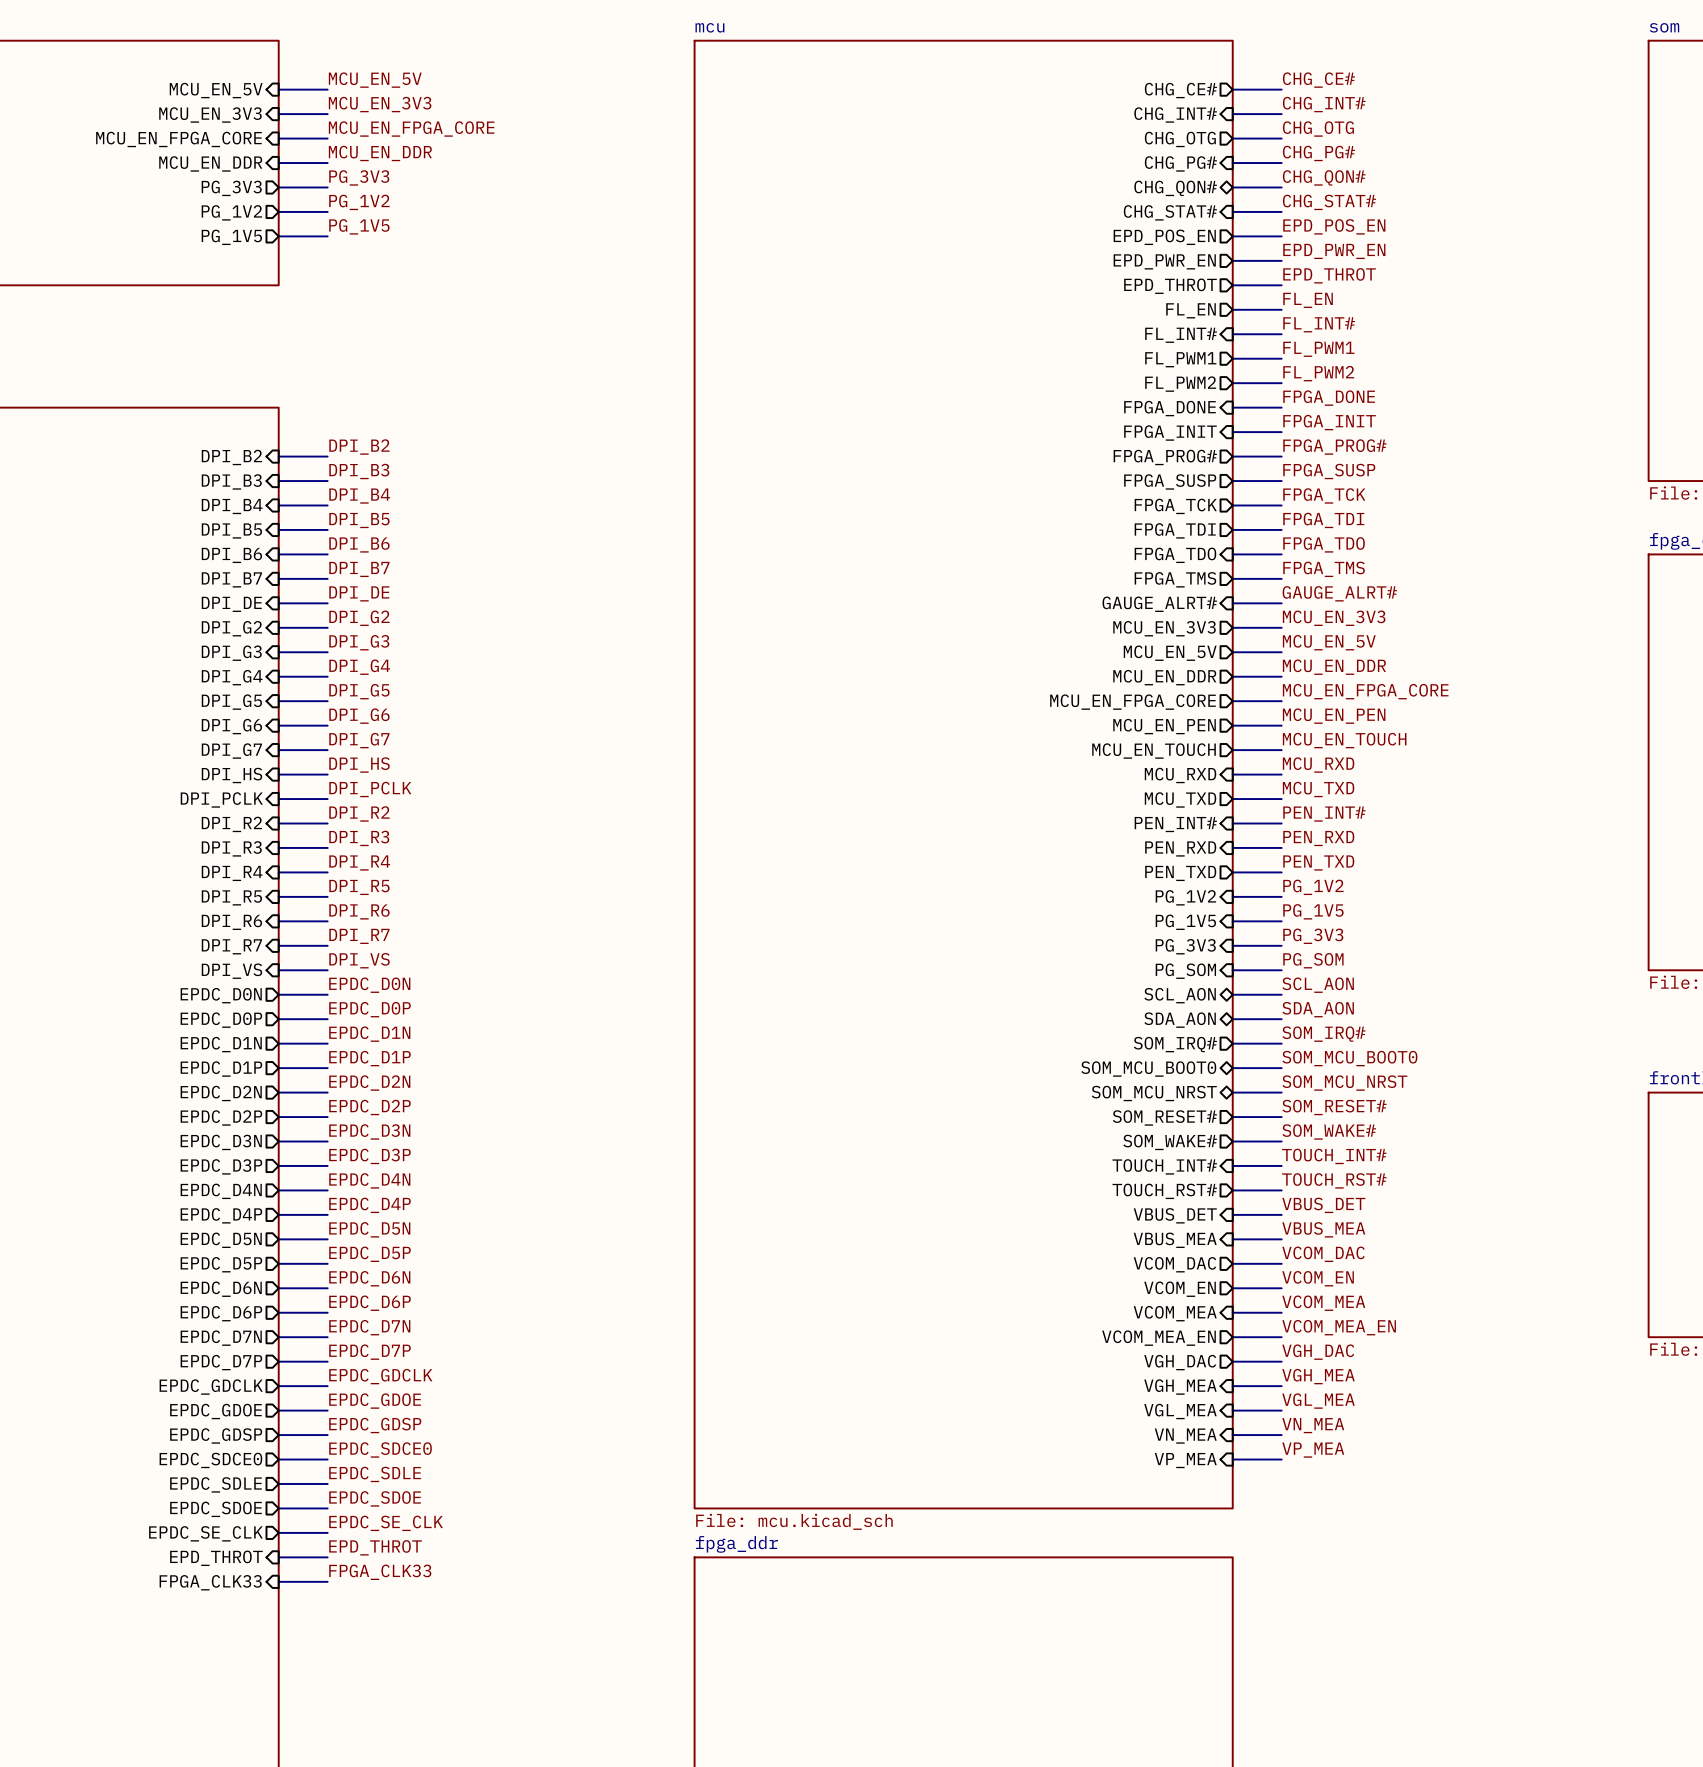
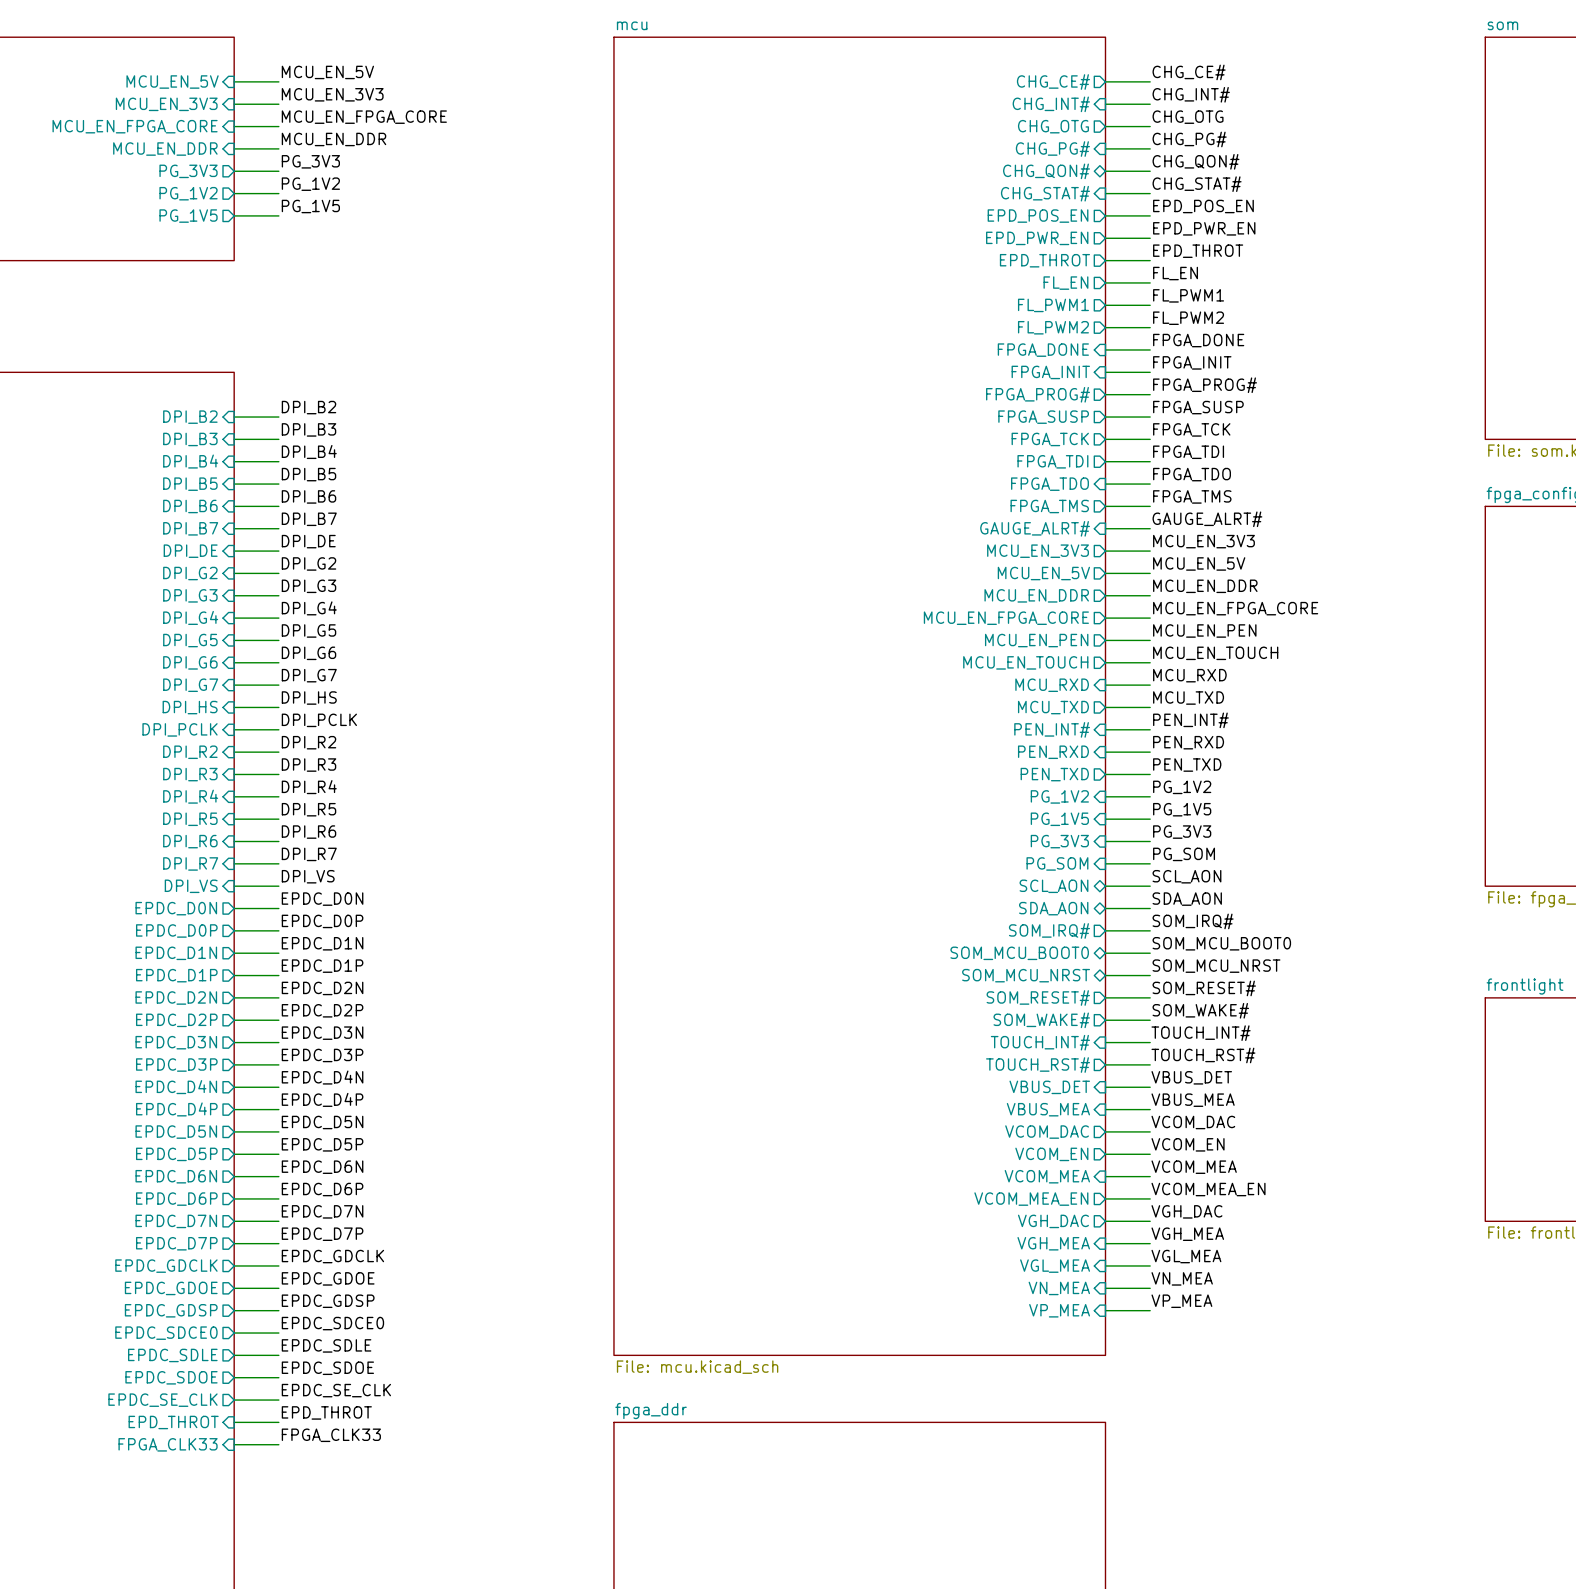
label: FL_INT# (1319, 324) -> FL_PWM1 (1188, 295)
sheet pin shape: input (1181, 335) -> output (1053, 305)
sheet pin: FL_INT# (1181, 335) -> FL_PWM1 (1053, 305)
label: FL_PWM1 (1318, 349) -> FL_PWM2 (1188, 318)
sheet pin: FL_PWM1 (1180, 359) -> FL_PWM2 (1053, 327)
label: FL_PWM2 (1318, 373) -> FPGA_DONE (1198, 340)
sheet pin shape: output (1180, 384) -> input (1043, 350)
sheet pin: FL_PWM2 (1180, 384) -> FPGA_DONE (1043, 350)
label: FPGA_DONE (1329, 398) -> FPGA_INIT (1192, 362)
sheet pin: FPGA_DONE (1169, 408) -> FPGA_INIT (1050, 372)
label: FPGA_INIT (1329, 422) -> FPGA_PROG# (1205, 385)
sheet pin shape: input (1170, 433) -> output (1038, 394)
sheet pin: FPGA_INIT (1170, 433) -> FPGA_PROG# (1038, 394)
label: FPGA_PROG# (1334, 447) -> FPGA_SUSP (1198, 407)
sheet pin: FPGA_PROG# (1165, 457) -> FPGA_SUSP (1043, 417)
label: FPGA_SUSP (1329, 471) -> FPGA_TCK (1191, 429)
sheet pin: FPGA_SUSP (1170, 481) -> FPGA_TCK (1050, 439)
label: FPGA_TCK (1324, 495) -> FPGA_TDI (1188, 452)
sheet pin: FPGA_TCK (1175, 506) -> FPGA_TDI (1052, 461)
label: FPGA_TDI (1323, 520) -> FPGA_TDO (1192, 474)
sheet pin shape: output (1175, 530) -> input (1049, 484)
sheet pin: FPGA_TDI (1175, 530) -> FPGA_TDO (1049, 484)
label: FPGA_TDO (1324, 544) -> FPGA_TMS (1192, 496)
sheet pin shape: input (1175, 555) -> output (1049, 506)
sheet pin: FPGA_TDO (1175, 555) -> FPGA_TMS (1049, 506)
label: FPGA_TMS (1324, 569) -> GAUGE_ALRT# (1207, 519)
sheet pin shape: output (1175, 579) -> input (1035, 528)
sheet pin: FPGA_TMS (1175, 579) -> GAUGE_ALRT# (1035, 528)
label: GAUGE_ALRT# (1339, 593) -> MCU_EN_3V3 (1203, 541)
sheet pin shape: input (1159, 604) -> output (1038, 551)
sheet pin: GAUGE_ALRT# (1159, 604) -> MCU_EN_3V3 (1038, 551)
label: MCU_EN_3V3 (1334, 618) -> MCU_EN_5V (1199, 563)
sheet pin: MCU_EN_3V3 (1164, 628) -> MCU_EN_5V (1043, 573)
label: MCU_EN_5V (1329, 642) -> MCU_EN_DDR (1205, 586)
sheet pin: MCU_EN_5V (1170, 653) -> MCU_EN_DDR (1036, 595)
label: MCU_EN_DDR (1334, 667) -> MCU_EN_FPGA_CORE (1235, 608)
sheet pin: MCU_EN_DDR (1164, 677) -> MCU_EN_FPGA_CORE (1006, 618)
label: MCU_EN_FPGA_CORE (1365, 691) -> MCU_EN_PEN (1204, 630)
sheet pin: MCU_EN_FPGA_CORE (1132, 702) -> MCU_EN_PEN (1036, 640)
label: MCU_EN_PEN (1334, 716) -> MCU_EN_TOUCH (1215, 653)
sheet pin: MCU_EN_PEN (1164, 726) -> MCU_EN_TOUCH (1025, 662)
label: MCU_EN_TOUCH (1344, 740) -> MCU_RXD (1189, 675)
sheet pin shape: output (1154, 751) -> input (1052, 685)
sheet pin: MCU_EN_TOUCH (1154, 751) -> MCU_RXD (1052, 685)
sheet mcu: none -> File: mcu.kicad_sch (859, 696)
label: MCU_RXD (1318, 765) -> MCU_TXD (1188, 698)
sheet mcu: File: mcu.kicad_sch (963, 774) -> none
sheet pin shape: input (1180, 775) -> output (1053, 707)
sheet pin: MCU_RXD (1180, 775) -> MCU_TXD (1053, 707)
label: MCU_TXD (1318, 789) -> PEN_INT# (1190, 720)
sheet pin shape: output (1180, 799) -> input (1052, 729)
sheet pin: MCU_TXD (1180, 799) -> PEN_INT# (1052, 729)
label: PEN_INT# (1324, 814) -> PEN_RXD (1188, 742)
sheet pin: PEN_INT# (1175, 824) -> PEN_RXD (1053, 752)
label: PEN_RXD (1318, 838) -> PEN_TXD (1187, 765)
sheet pin shape: input (1180, 848) -> output (1054, 774)
sheet pin: PEN_RXD (1180, 848) -> PEN_TXD (1054, 774)
label: PEN_TXD (1318, 862) -> PG_1V2 (1182, 787)
sheet pin shape: output (1180, 873) -> input (1059, 796)
sheet pin: PEN_TXD (1180, 873) -> PG_1V2 (1059, 796)
label: PG_1V2 (1313, 887) -> PG_1V5 (1182, 809)
sheet pin: PG_1V2 (1185, 897) -> PG_1V5 (1059, 819)
label: PG_1V5 (1313, 911) -> PG_3V3 (1182, 832)
sheet pin: PG_1V5 (1185, 922) -> PG_3V3 (1059, 841)
label: PG_3V3 (1313, 936) -> PG_SOM (1184, 854)
sheet pin: PG_3V3 (1185, 946) -> PG_SOM (1057, 863)
label: PG_SOM (1313, 960) -> SCL_AON (1186, 876)
sheet pin shape: input (1185, 971) -> bidirectional (1053, 886)
sheet pin: PG_SOM (1185, 971) -> SCL_AON (1053, 886)
label: SCL_AON (1318, 985) -> SDA_AON (1187, 899)
sheet pin: SCL_AON (1180, 995) -> SDA_AON (1053, 908)
label: SDA_AON (1318, 1009) -> SOM_IRQ# (1193, 921)
sheet pin shape: bidirectional (1180, 1020) -> output (1049, 930)
sheet pin: SDA_AON (1180, 1020) -> SOM_IRQ# (1049, 930)
label: SOM_IRQ# (1323, 1034) -> SOM_MCU_BOOT0 (1221, 943)
sheet pin shape: output (1175, 1044) -> bidirectional (1019, 953)
sheet pin: SOM_IRQ# (1175, 1044) -> SOM_MCU_BOOT0 (1019, 953)
label: SOM_MCU_BOOT0 (1349, 1058) -> SOM_MCU_NRST (1216, 966)
sheet pin: SOM_MCU_BOOT0 (1148, 1069) -> SOM_MCU_NRST (1026, 975)
label: SOM_MCU_NRST (1344, 1083) -> SOM_RESET# (1204, 988)
sheet pin shape: bidirectional (1154, 1093) -> output (1038, 998)
sheet pin: SOM_MCU_NRST (1154, 1093) -> SOM_RESET# (1038, 998)
label: SOM_RESET# (1334, 1107) -> SOM_WAKE# (1200, 1010)
sheet pin: SOM_RESET# (1164, 1117) -> SOM_WAKE# (1041, 1020)
label: SOM_WAKE# (1329, 1131) -> TOUCH_INT# (1201, 1033)
sheet pin shape: output (1170, 1142) -> input (1040, 1042)
sheet pin: SOM_WAKE# (1170, 1142) -> TOUCH_INT# (1040, 1042)
label: TOUCH_INT# (1334, 1156) -> TOUCH_RST# (1203, 1055)
sheet pin shape: input (1164, 1166) -> output (1038, 1065)
sheet pin: TOUCH_INT# (1164, 1166) -> TOUCH_RST# (1038, 1065)
label: TOUCH_RST# (1334, 1180) -> VBUS_DET (1191, 1077)
sheet pin shape: output (1164, 1191) -> input (1049, 1087)
sheet pin: TOUCH_RST# (1164, 1191) -> VBUS_DET (1049, 1087)
label: VBUS_DET (1323, 1205) -> VBUS_MEA (1193, 1100)
sheet pin: VBUS_DET (1175, 1215) -> VBUS_MEA (1048, 1109)
label: VBUS_MEA (1323, 1229) -> VCOM_DAC (1193, 1122)
sheet pin shape: input (1175, 1240) -> output (1047, 1132)
sheet pin: VBUS_MEA (1175, 1240) -> VCOM_DAC (1047, 1132)
label: VCOM_DAC (1323, 1254) -> VCOM_EN (1188, 1144)
sheet pin: VCOM_DAC (1174, 1264) -> VCOM_EN (1051, 1154)
label: VCOM_EN (1318, 1278) -> VCOM_MEA (1194, 1167)
sheet pin shape: output (1180, 1289) -> input (1047, 1176)
sheet pin: VCOM_EN (1180, 1289) -> VCOM_MEA (1047, 1176)
label: VCOM_MEA (1323, 1303) -> VCOM_MEA_EN (1208, 1189)
sheet pin shape: input (1175, 1313) -> output (1031, 1199)
sheet pin: VCOM_MEA (1175, 1313) -> VCOM_MEA_EN (1031, 1199)
label: VCOM_MEA_EN (1339, 1327) -> VGH_DAC (1186, 1211)
sheet pin: VCOM_MEA_EN (1159, 1338) -> VGH_DAC (1053, 1221)
label: VGH_DAC (1318, 1352) -> VGH_MEA (1187, 1234)
sheet pin shape: output (1180, 1362) -> input (1053, 1243)
sheet pin: VGH_DAC (1180, 1362) -> VGH_MEA (1053, 1243)
label: VGH_MEA (1318, 1376) -> VGL_MEA (1186, 1256)
sheet pin: VGH_MEA (1180, 1387) -> VGL_MEA (1055, 1266)
label: VGL_MEA (1318, 1401) -> VN_MEA (1182, 1278)
sheet pin: VGL_MEA (1180, 1411) -> VN_MEA (1059, 1288)
label: VN_MEA (1313, 1425) -> VP_MEA (1181, 1301)
sheet pin: VN_MEA (1185, 1436) -> VP_MEA (1059, 1310)
label: VP_MEA (1313, 1450) -> none
wire: (1232, 1459) (1281, 1459) -> none
sheet pin: VP_MEA (1185, 1460) -> none

